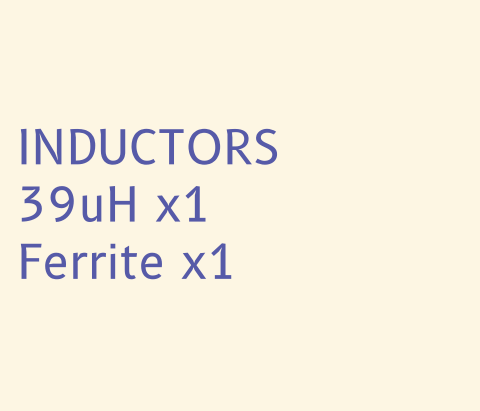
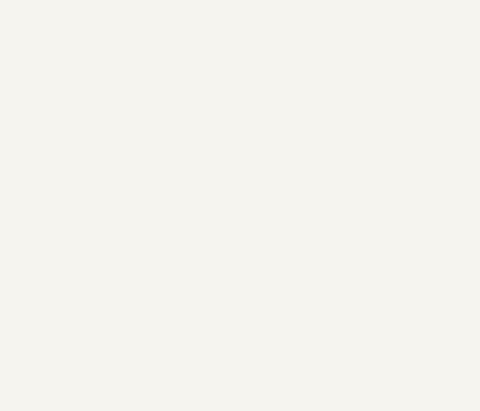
text: INDUCTORS (148, 146) -> none
text: 39uH x1 (113, 204) -> none
text: Ferrite x1 (126, 261) -> none

